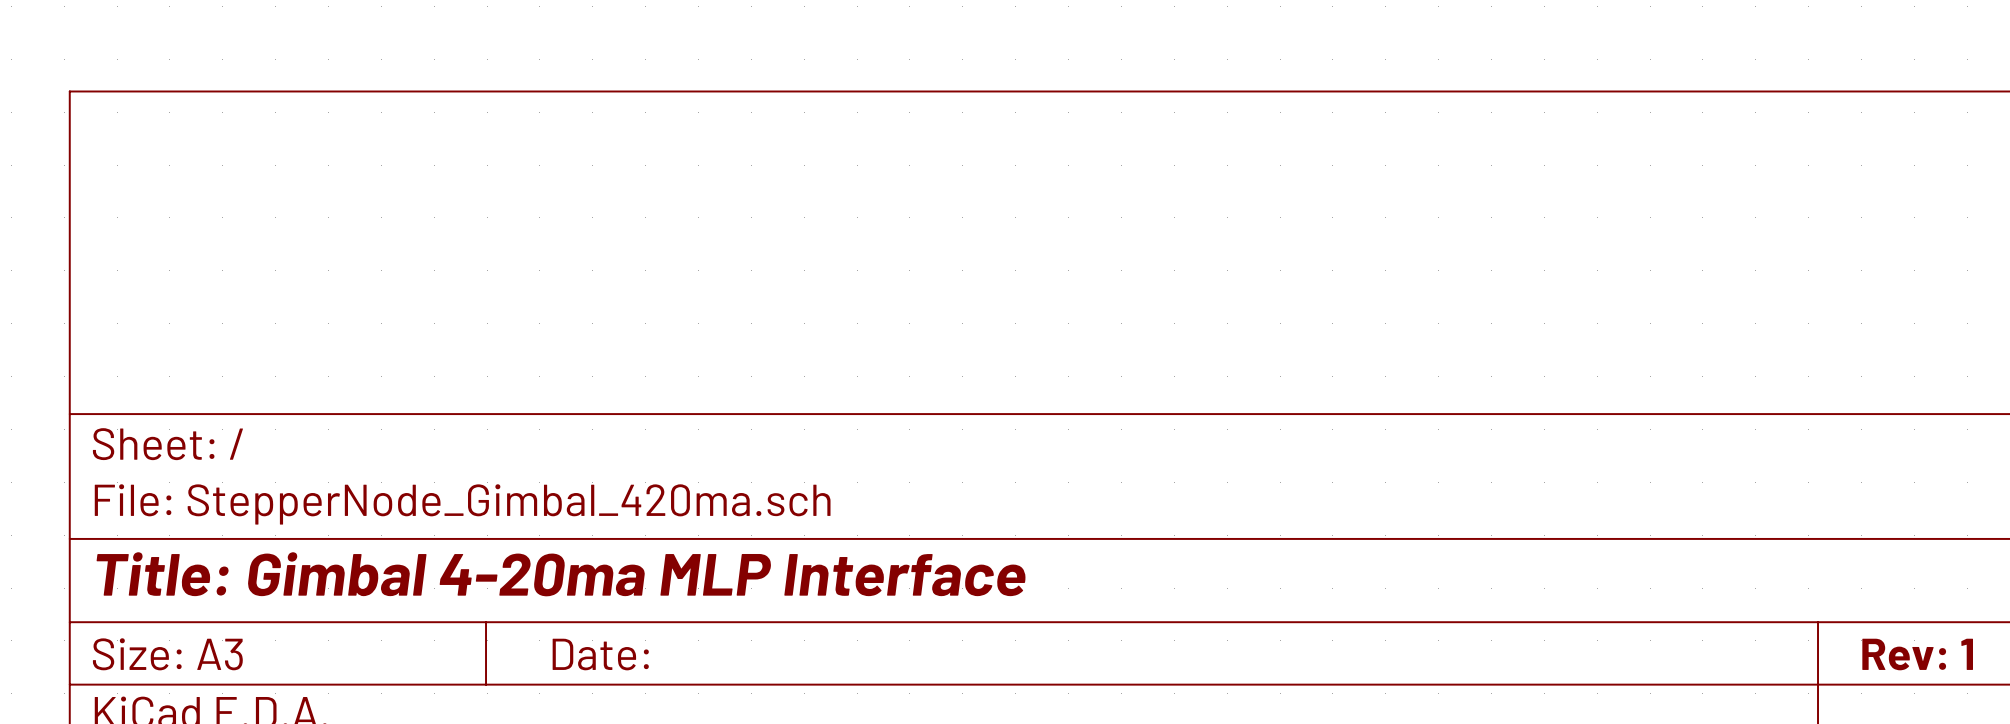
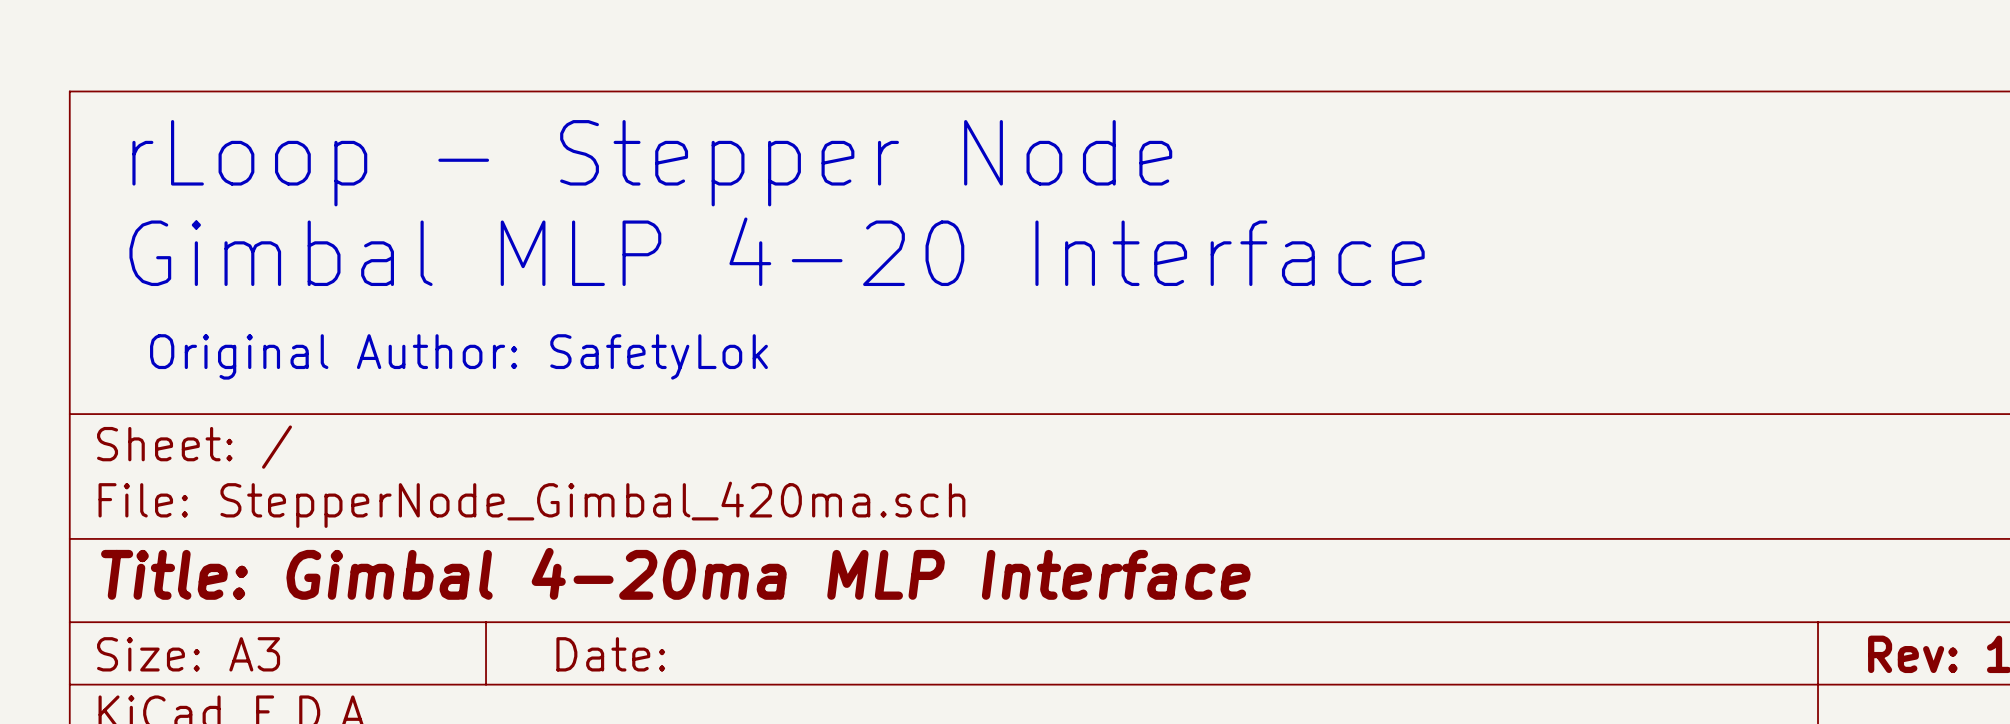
text: none -> rLoop - Stepper Node (652, 163)
text: none -> Gimbal MLP 4-20 Interface (777, 251)
text: none -> Original Author: SafetyLok (458, 356)

